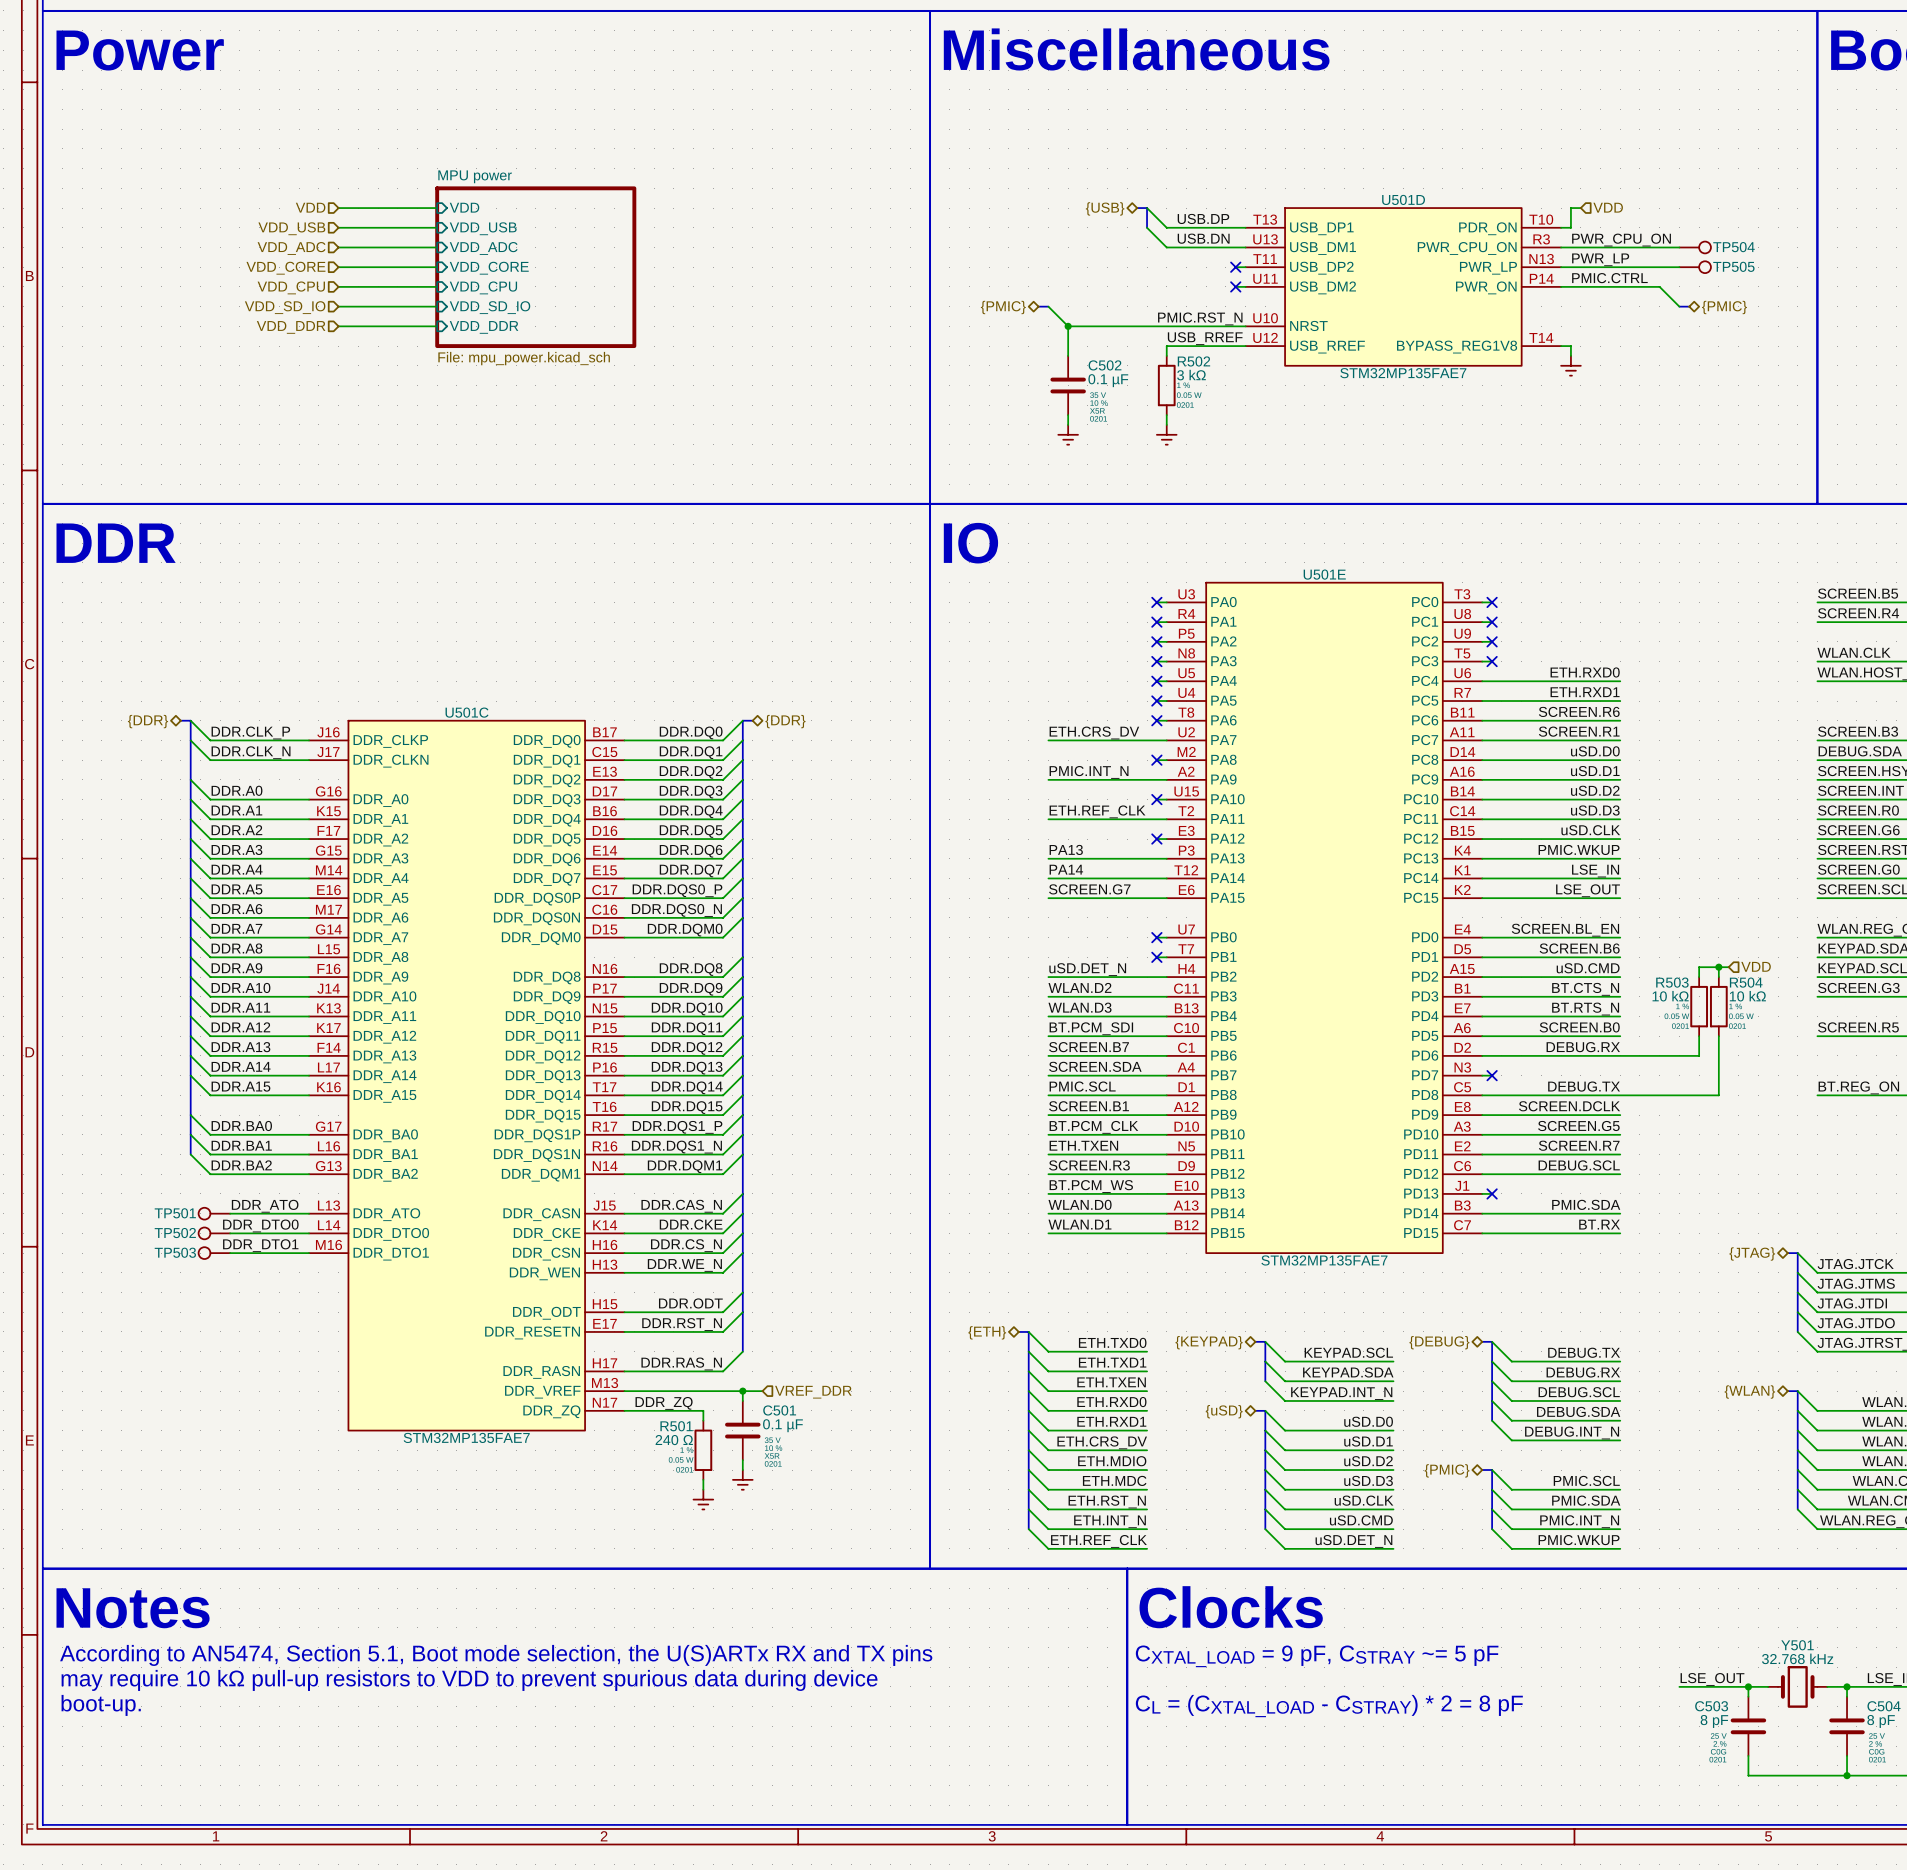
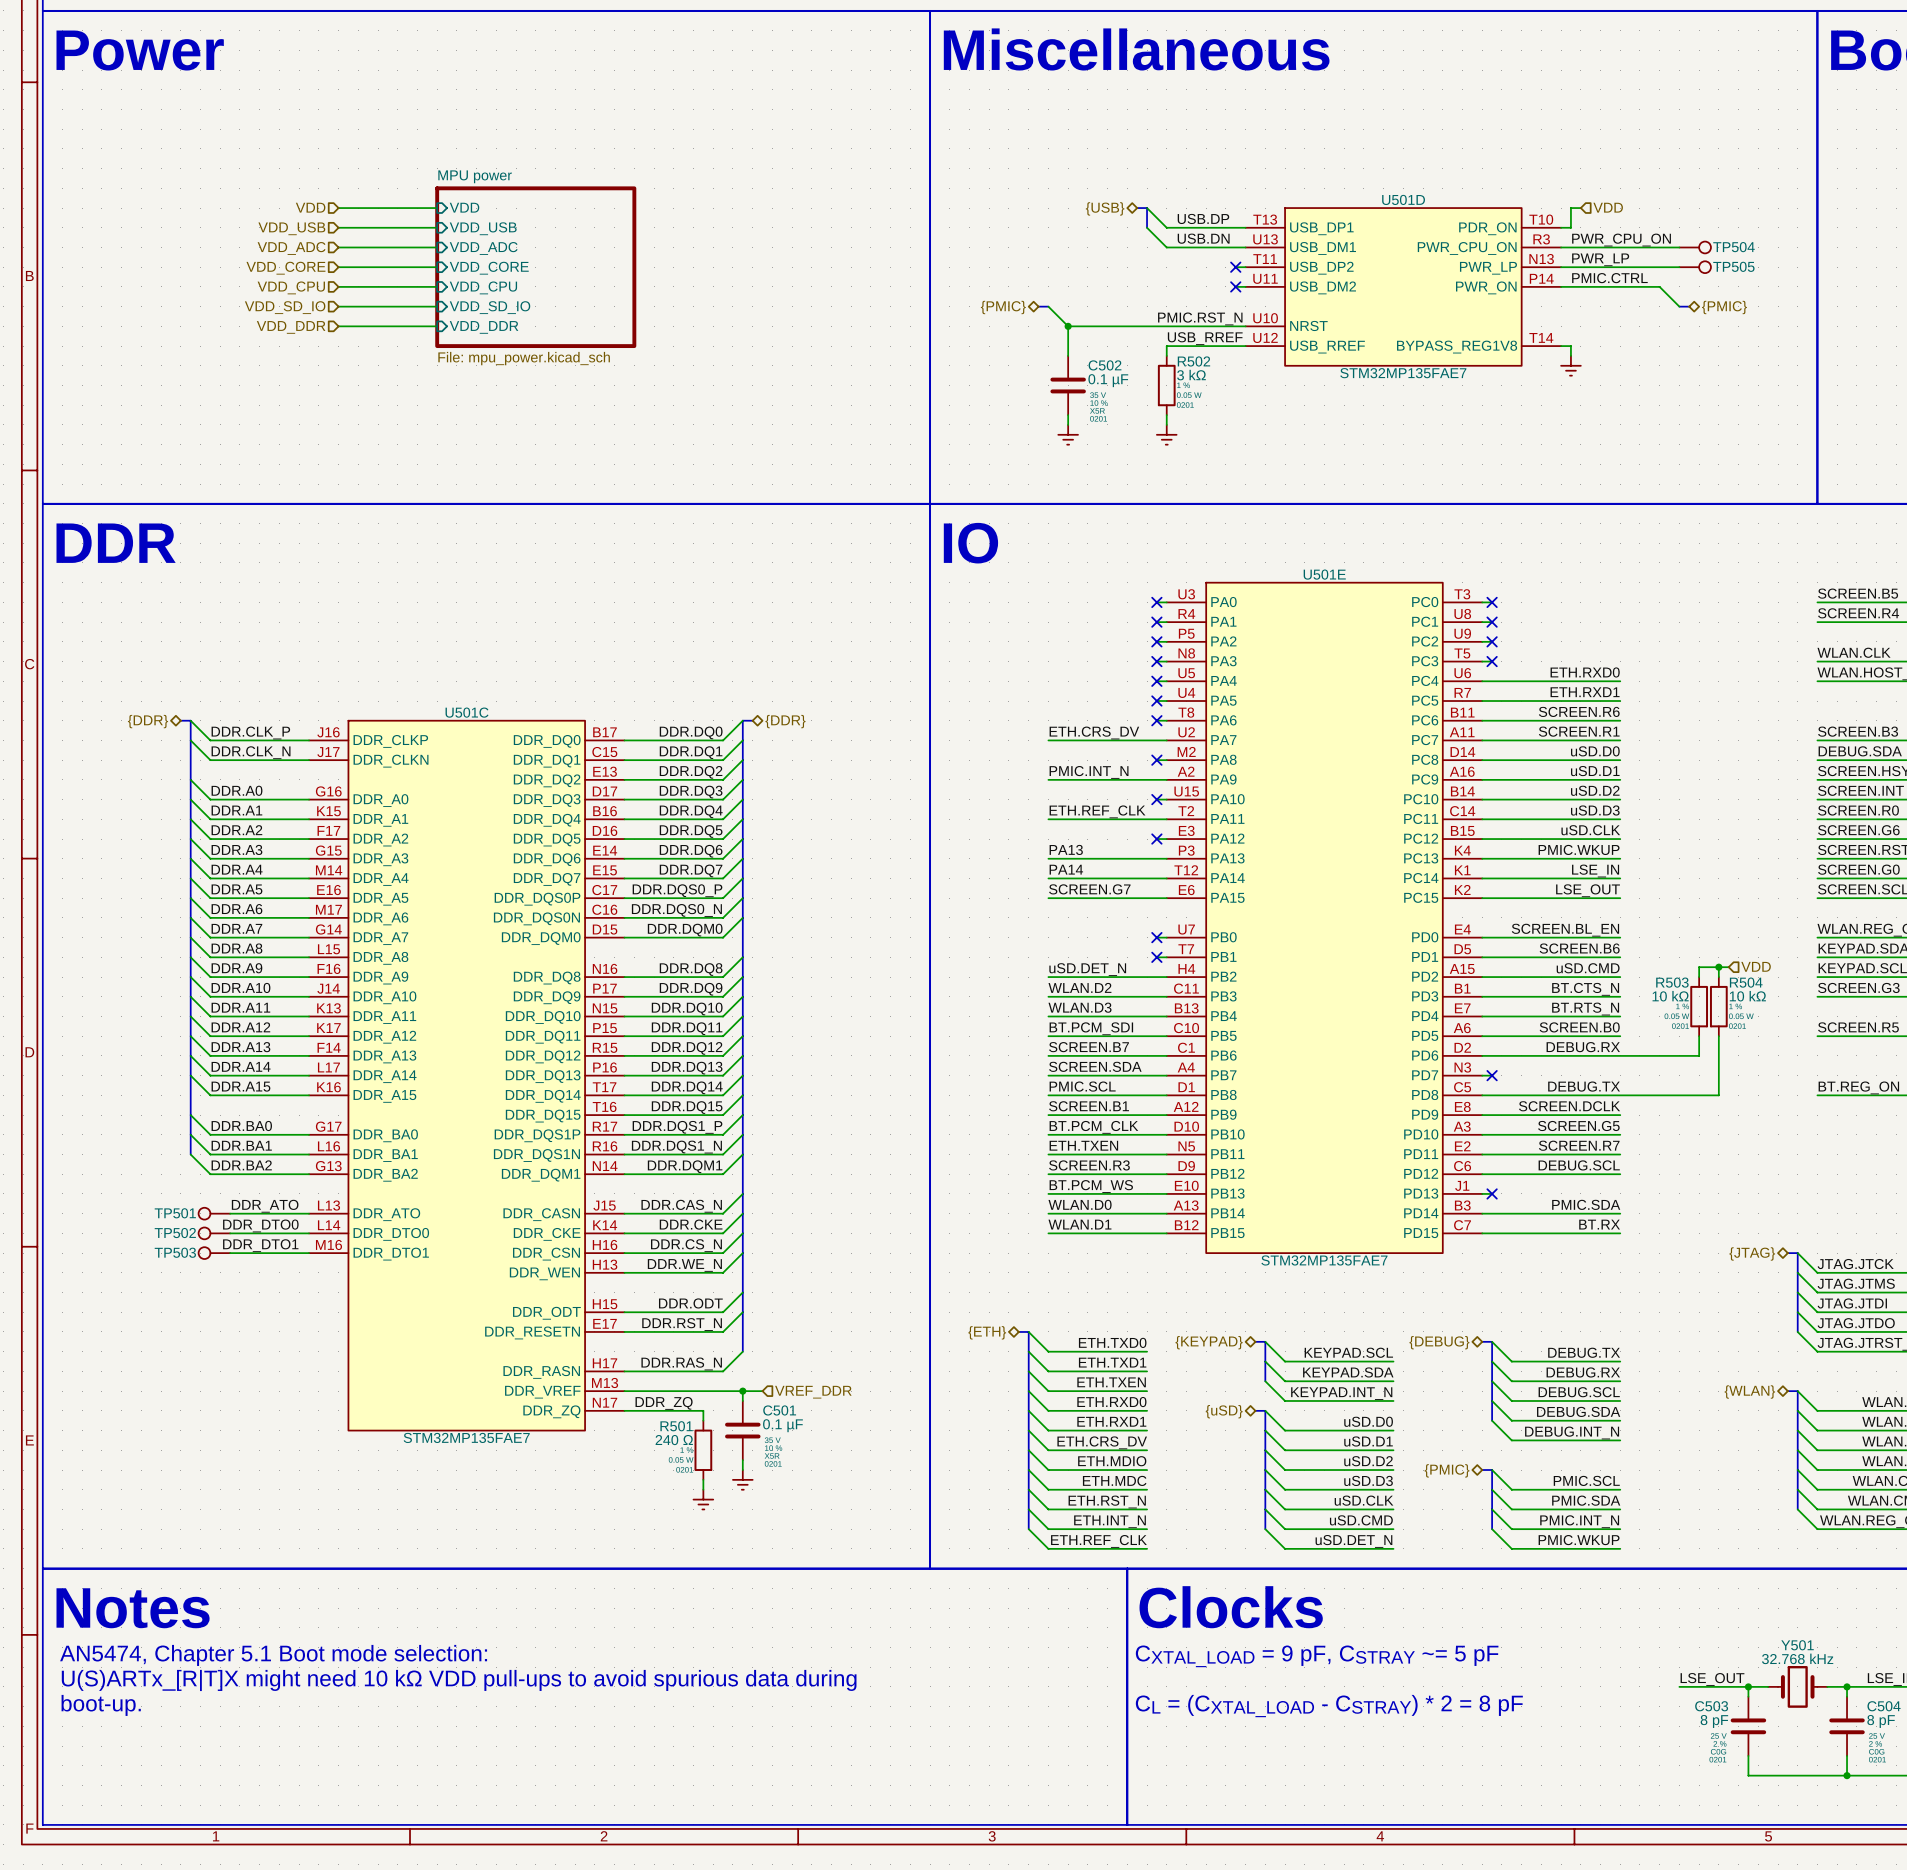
text: According to AN5474, Section 5.1, Boot mode selection, the U(S)ARTx RX and TX pins (496, 1655) -> AN5474, Chapter 5.1 Boot mode selection: (273, 1655)
text: may require 10 kΩ pull-up resistors to VDD to prevent spurious data during device (469, 1680) -> U(S)ARTx_[R|T]X might need 10 kΩ VDD pull-ups to avoid spurious data during (459, 1680)

